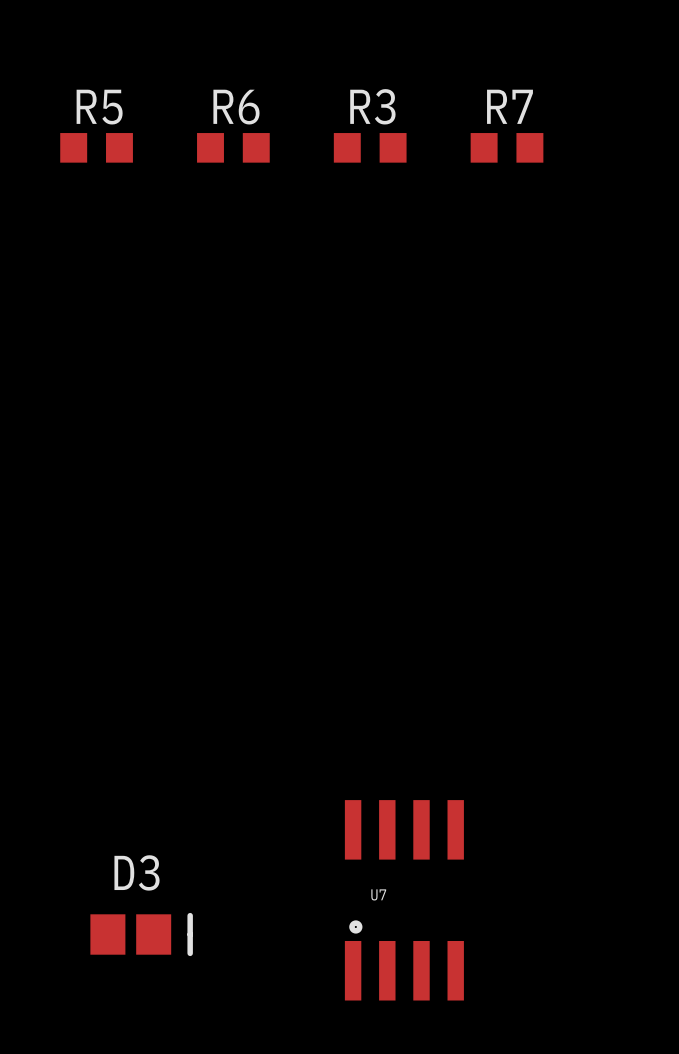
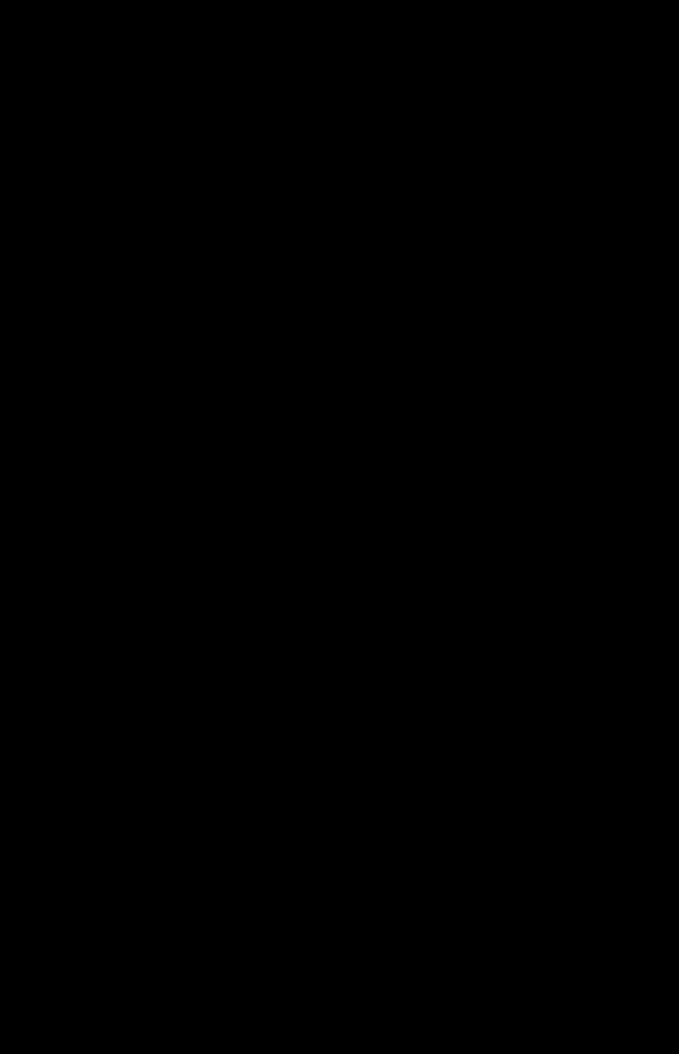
R5: (96, 147) -> none
R6: (233, 147) -> none
R3: (370, 147) -> none
R7: (507, 147) -> none
U7: (404, 900) -> none
D3: (141, 934) -> none

